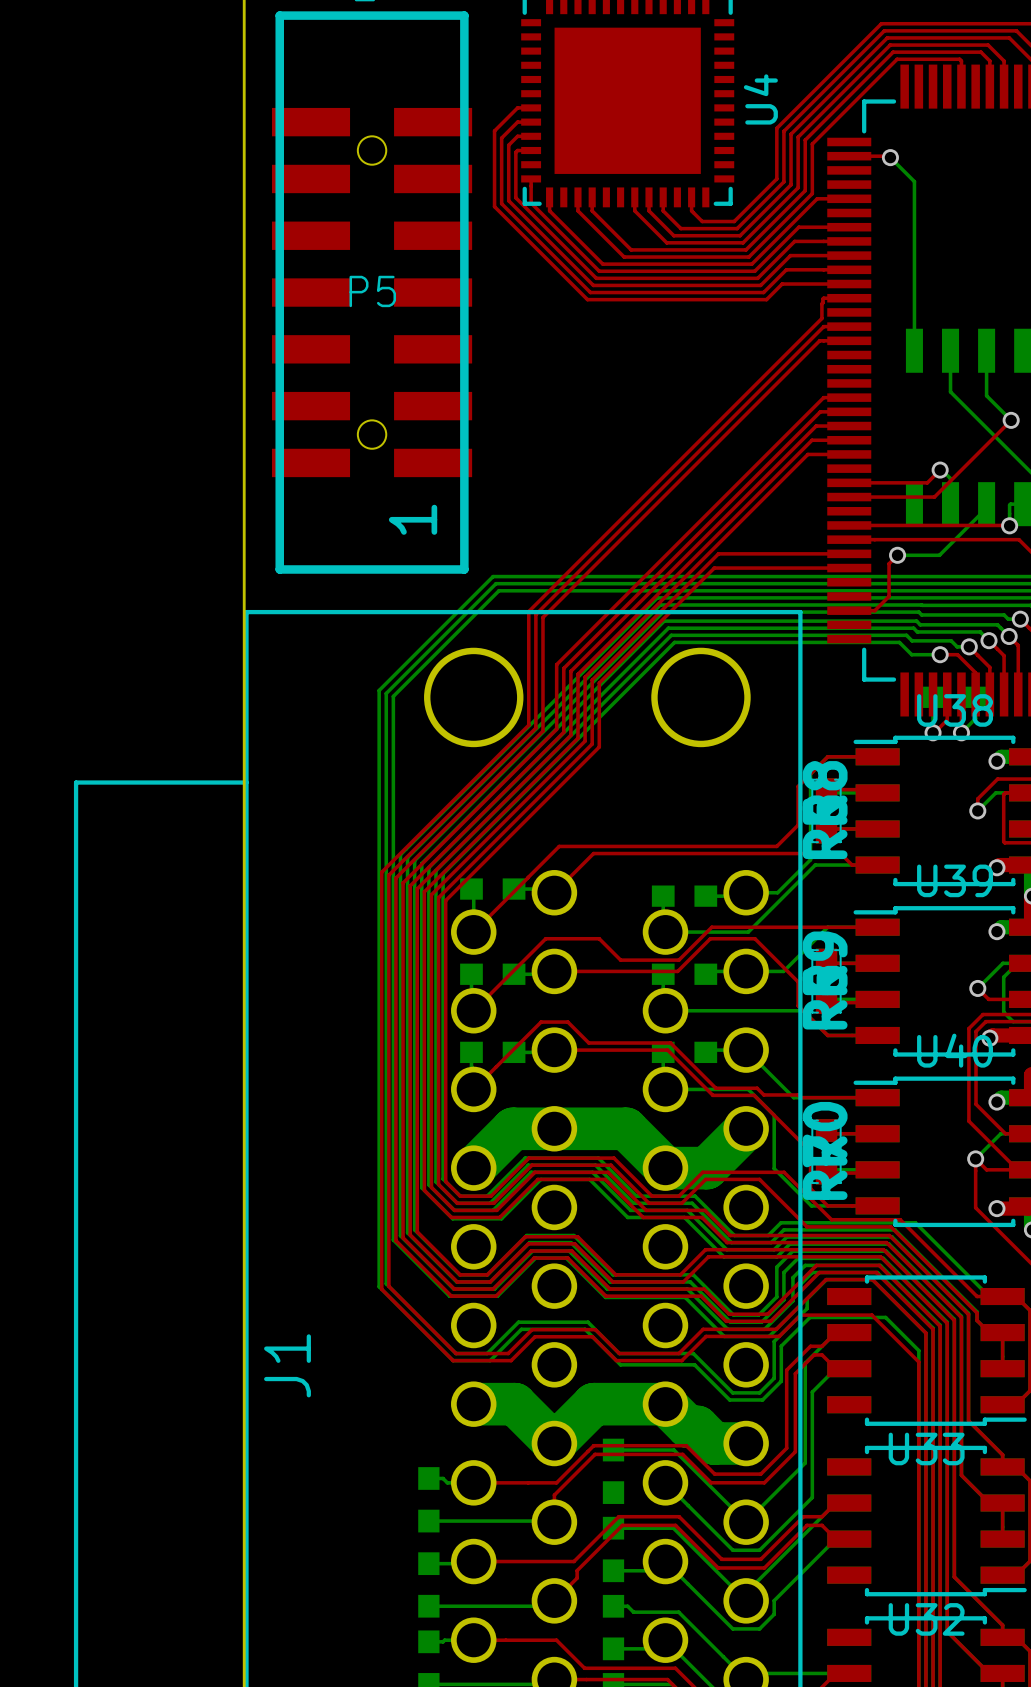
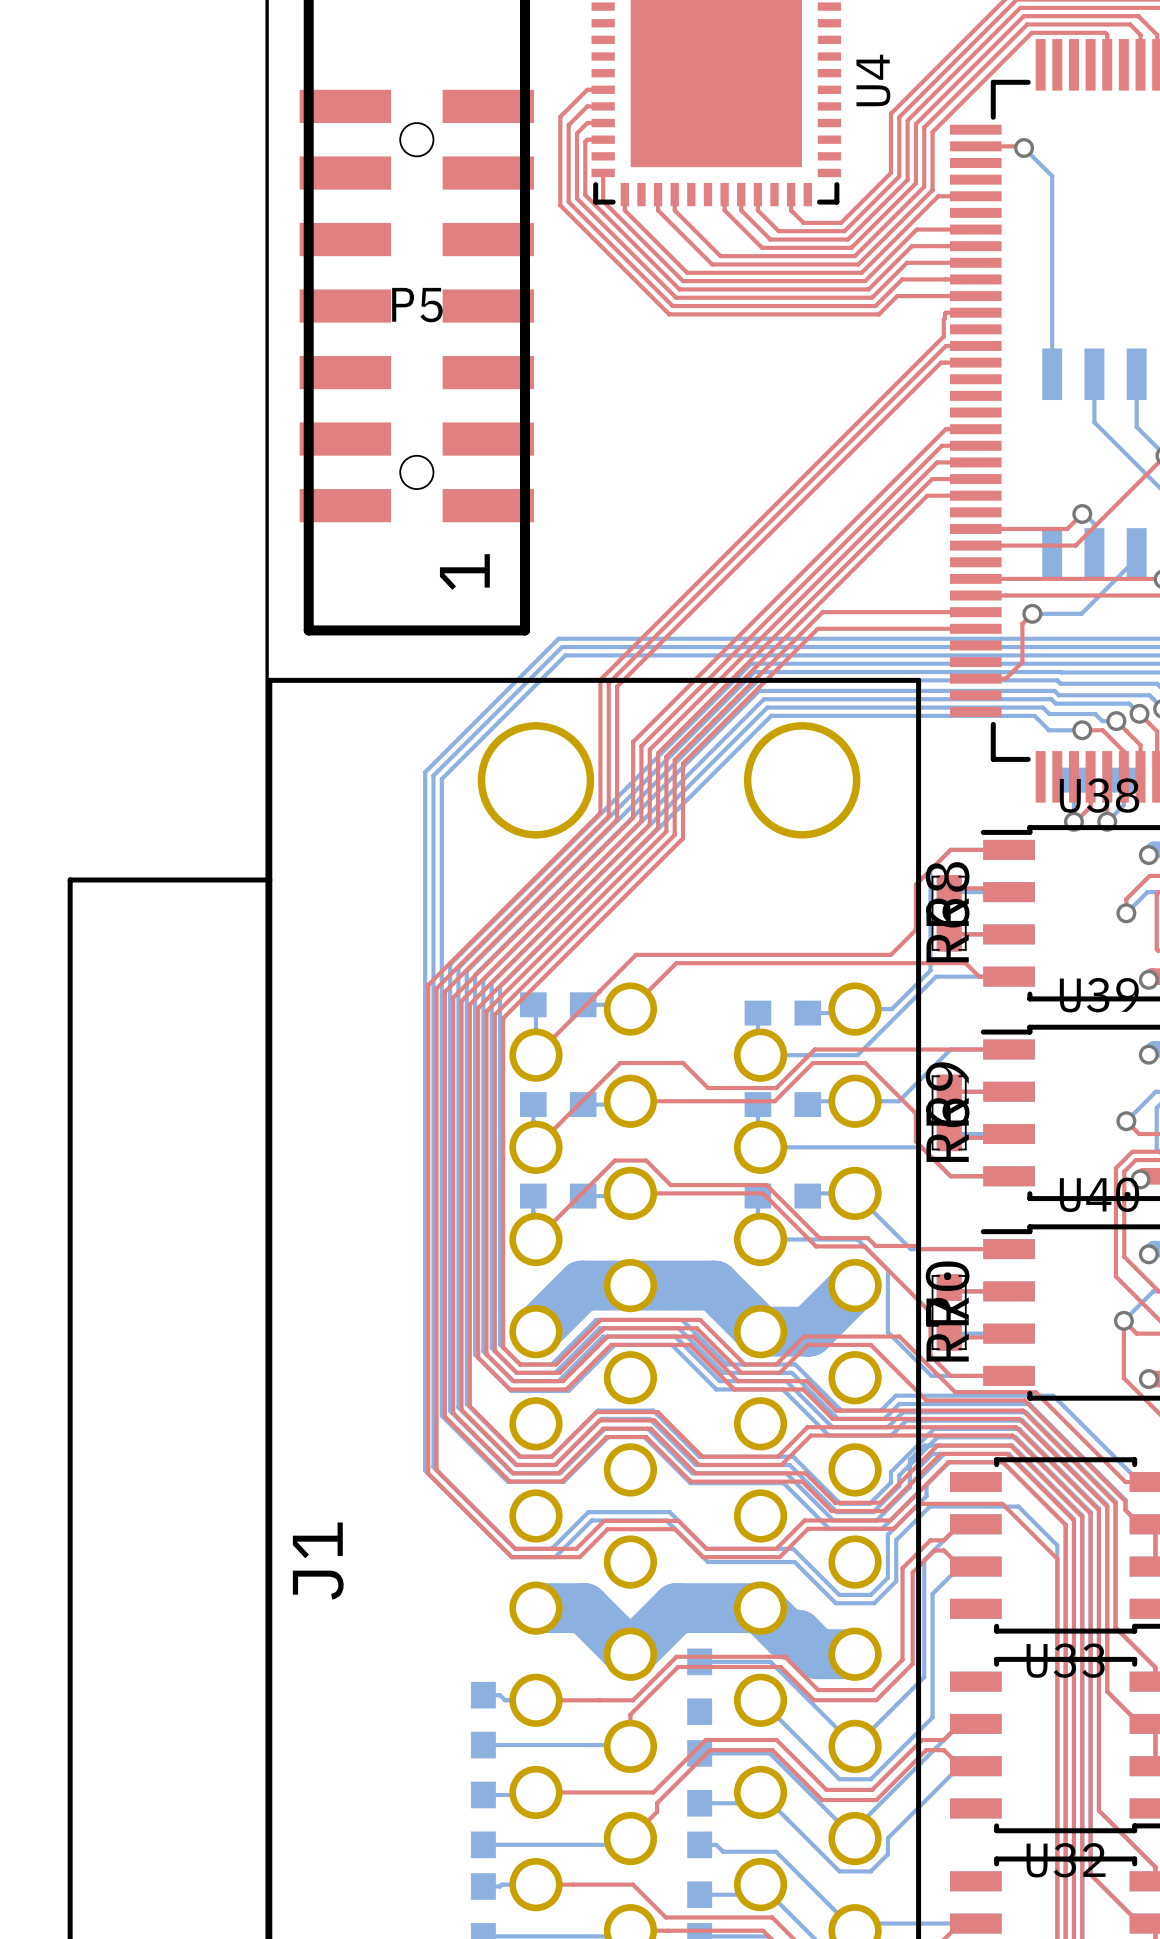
bottom track: (813, 1251) (792, 1251) (776, 1267) (776, 1287) -> (933, 1428) (890, 1471)
bottom track: (816, 1258) (798, 1258) (783, 1272) (783, 1290) -> (937, 1437) (899, 1475)
bottom track: none -> (944, 1453) (918, 1480)

